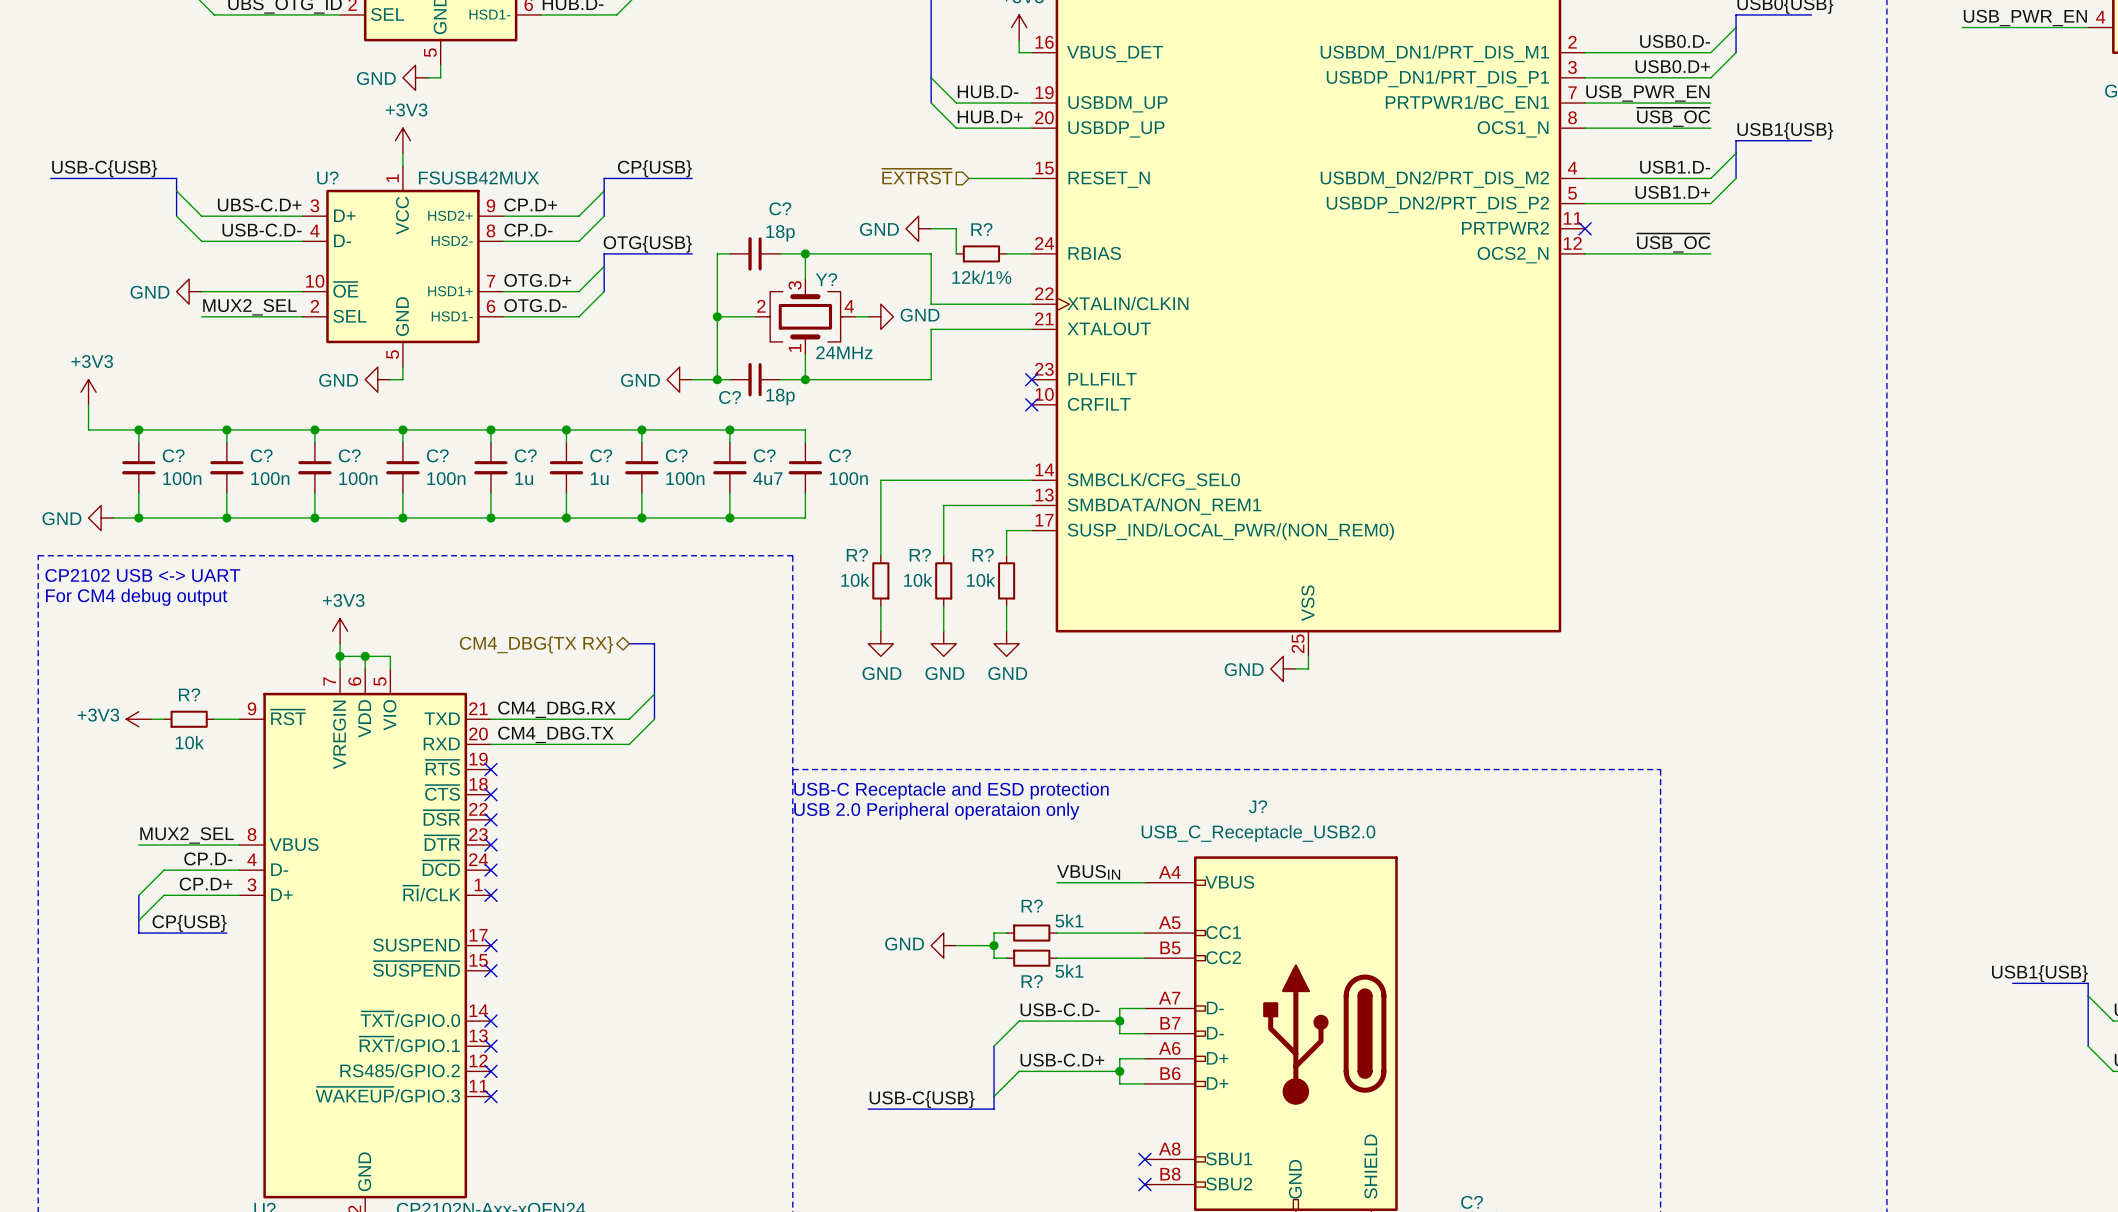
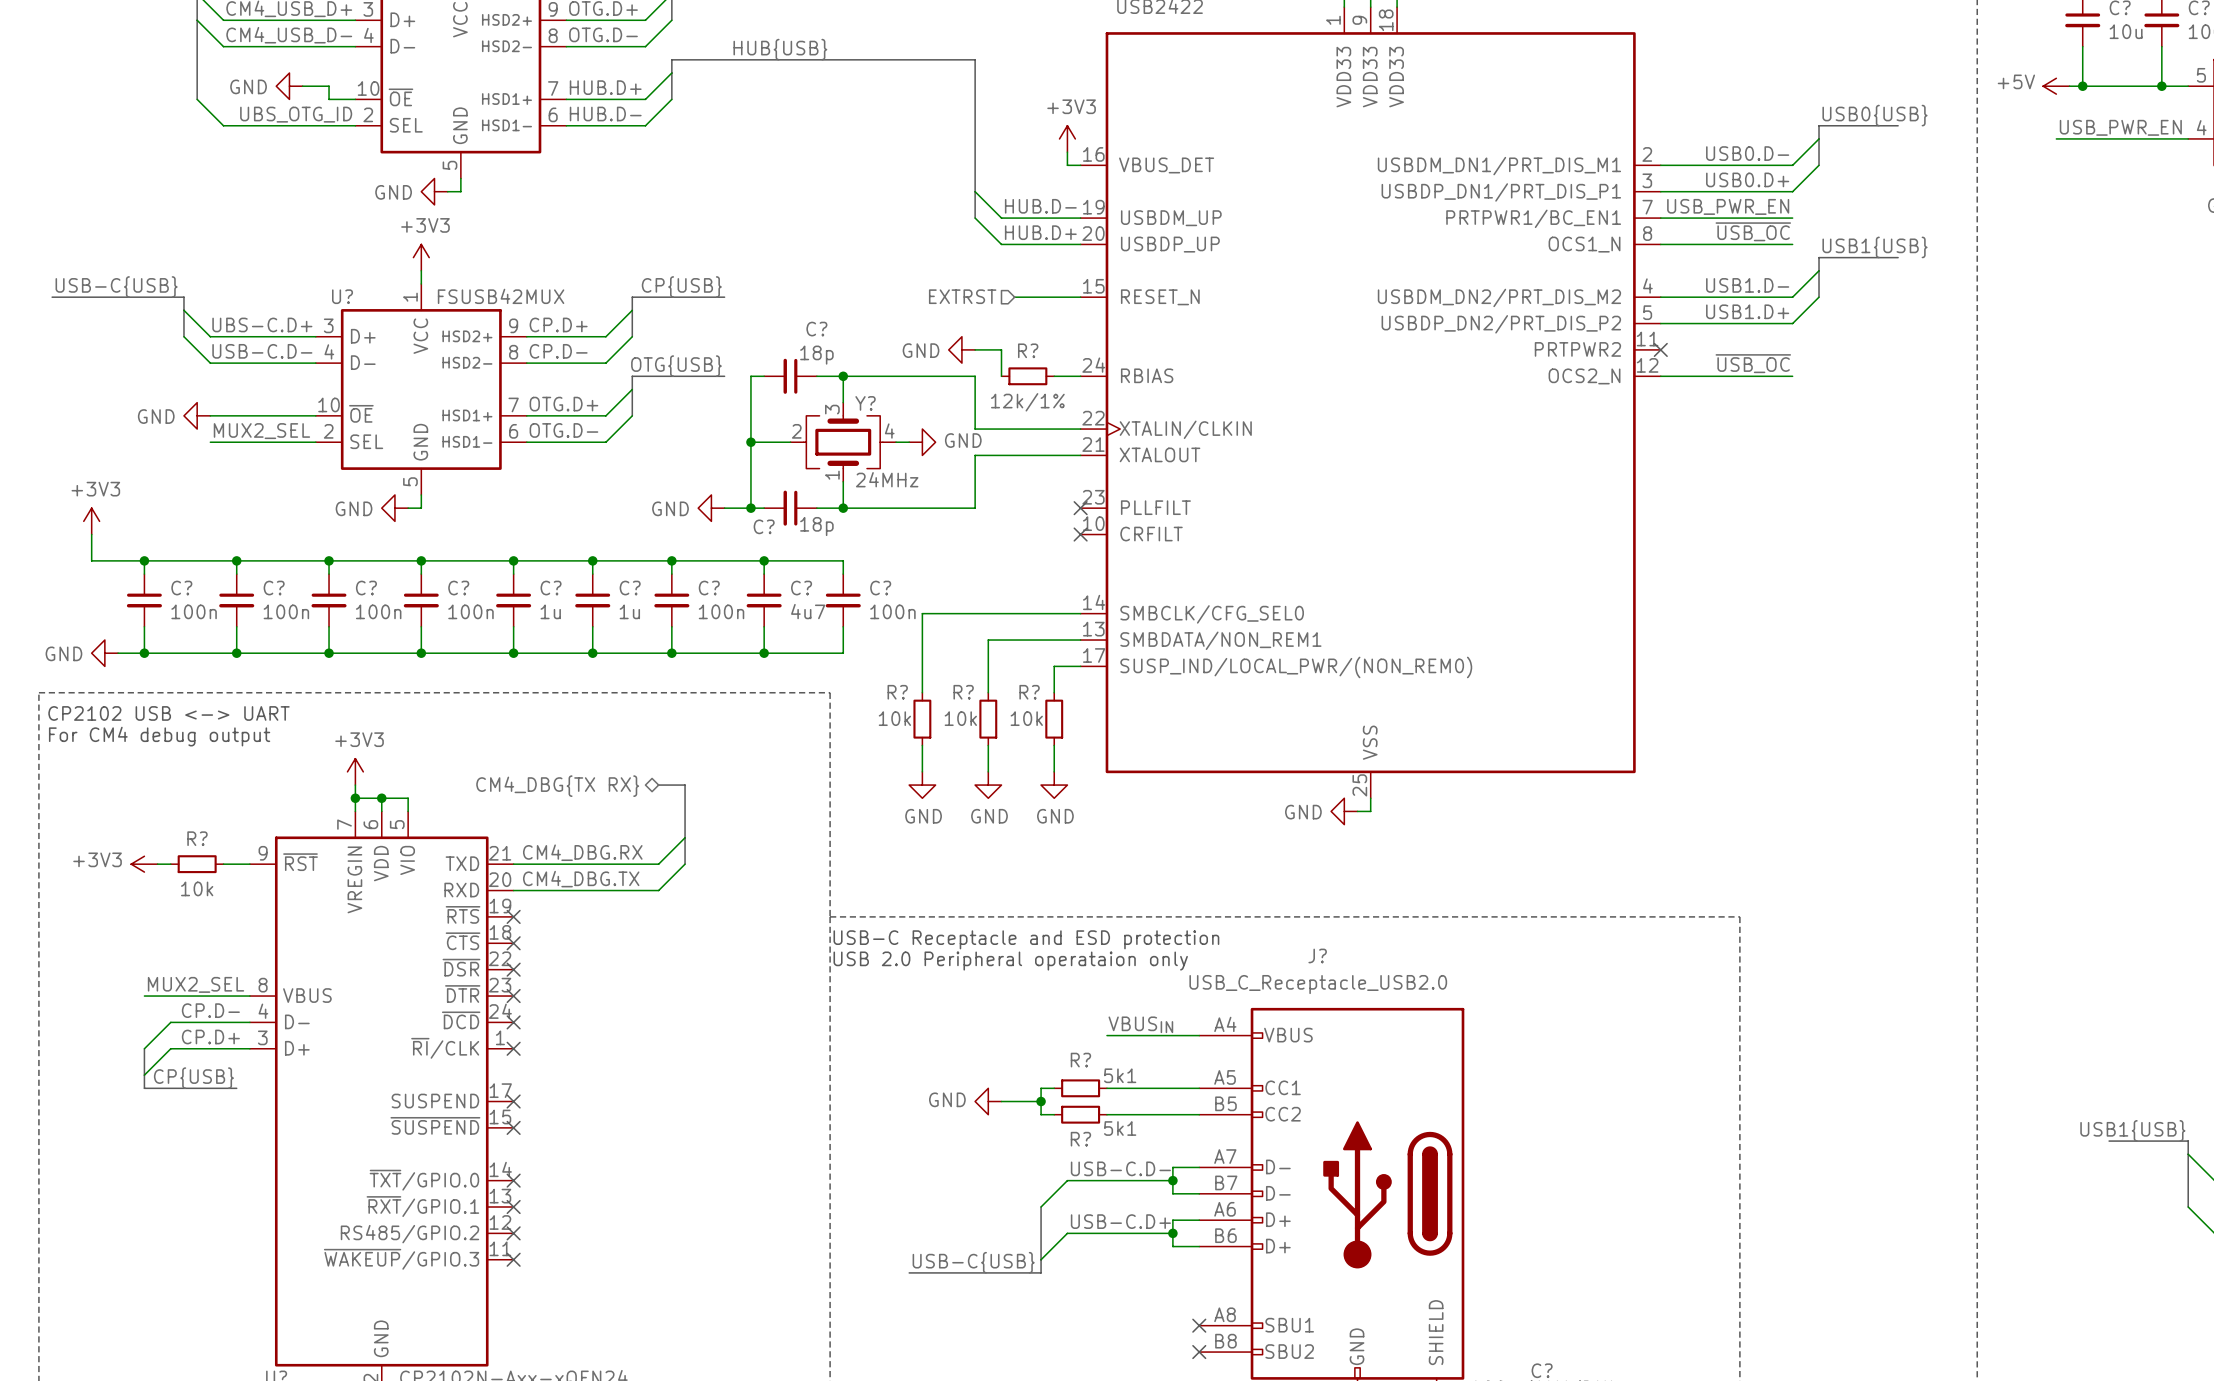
hierarchical label: ~{EXTRST} (917, 176) -> EXTRST (962, 296)

